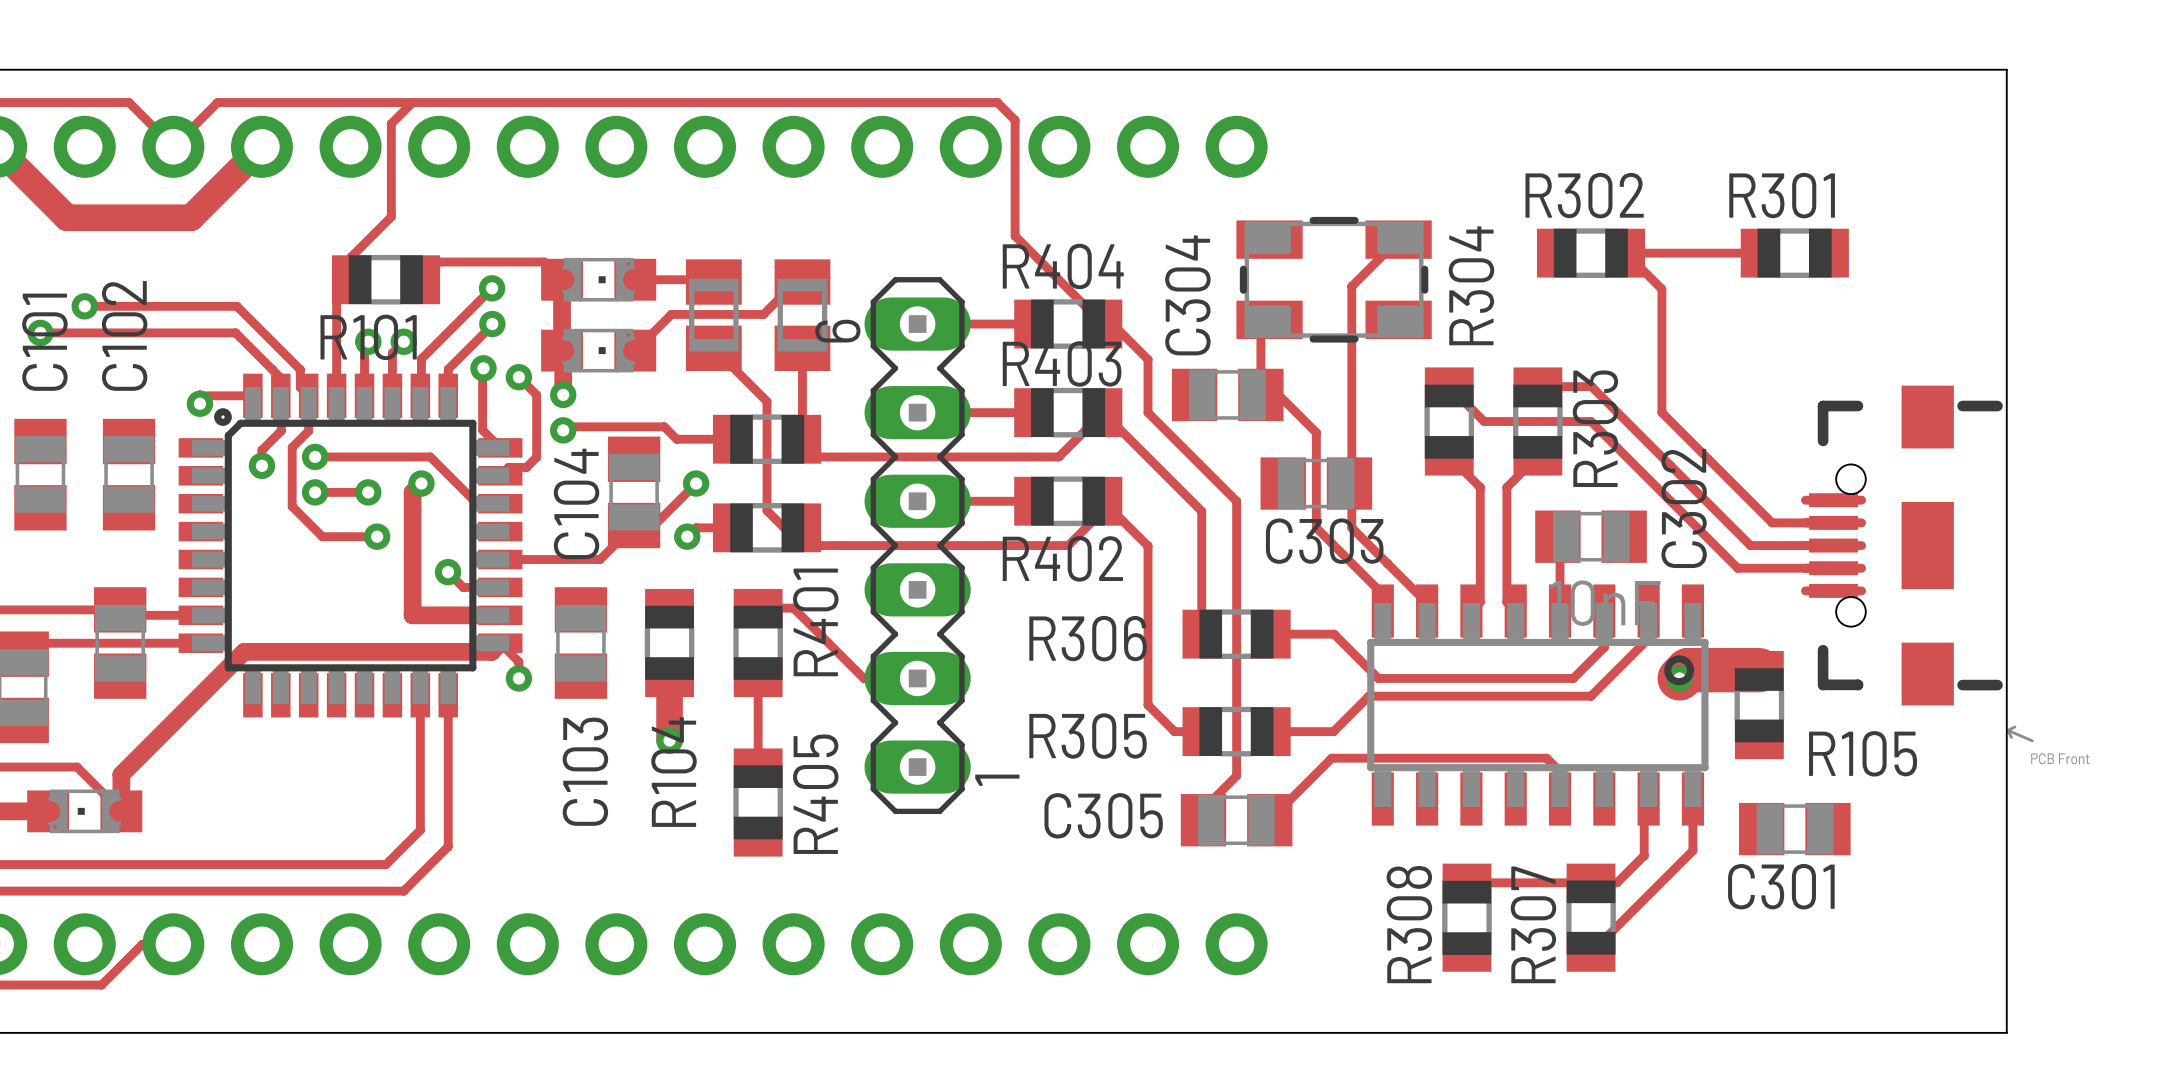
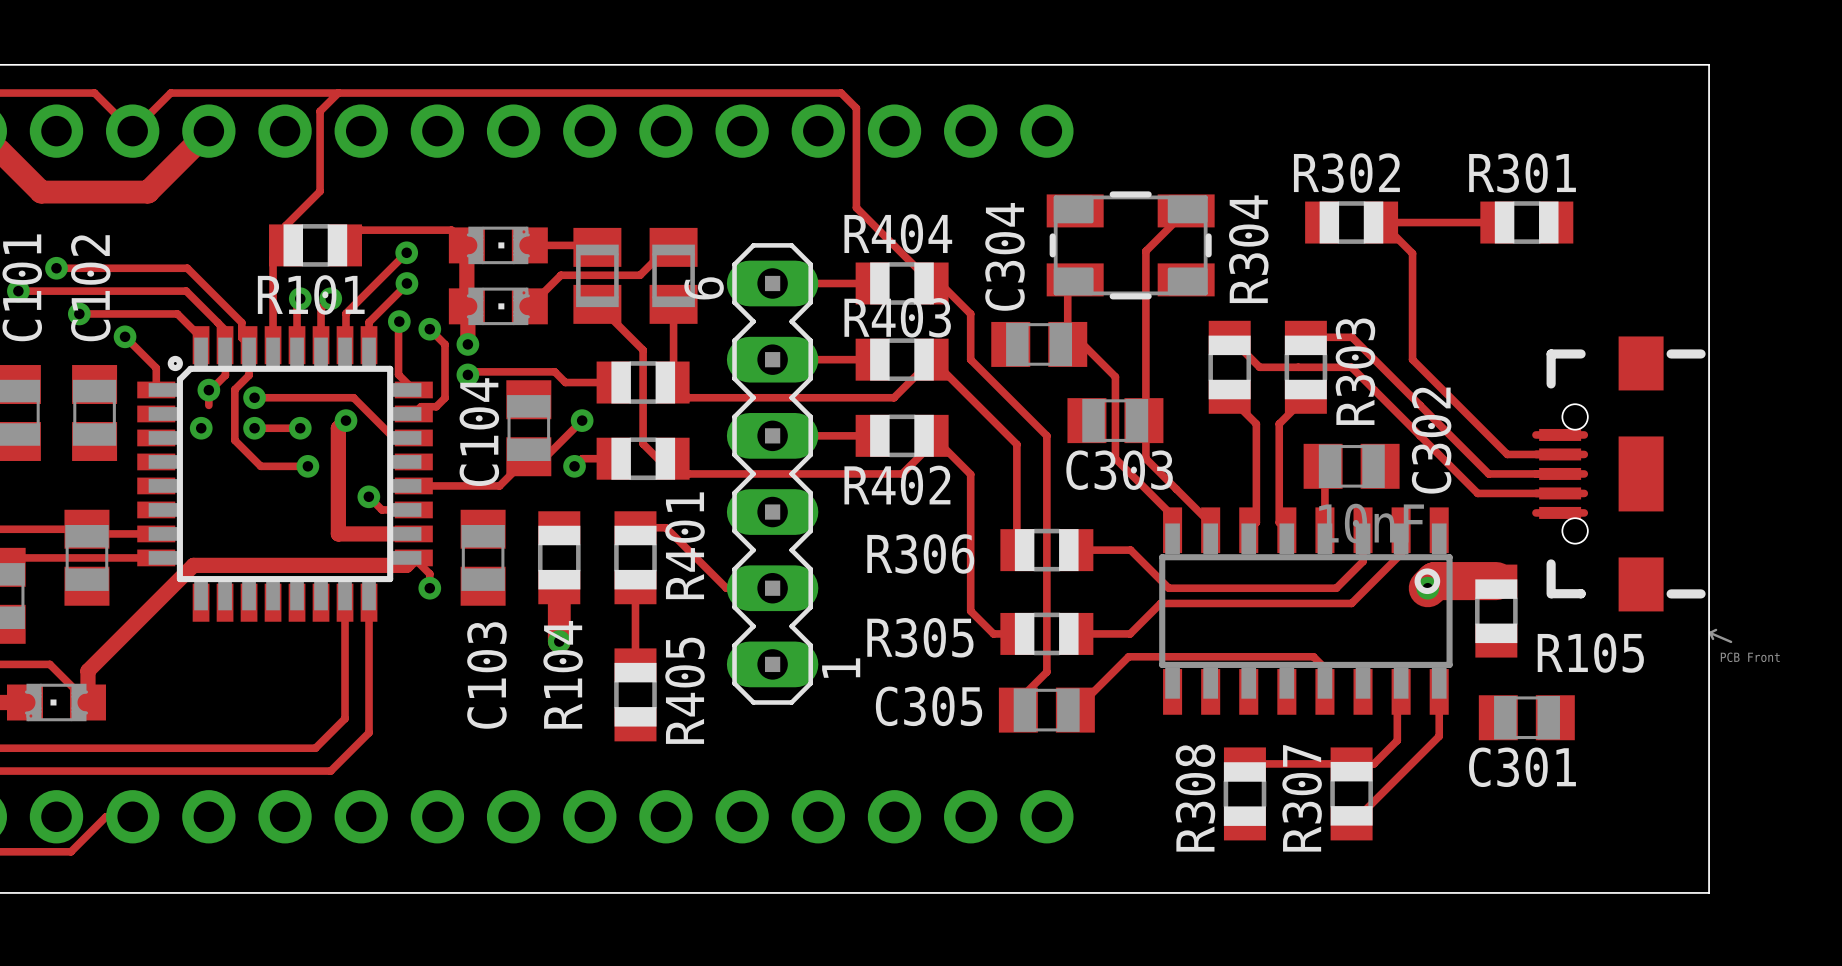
via: none -> (79, 313)
track: none -> (125, 336) (156, 368) (156, 389)
via: none -> (125, 336)
track: (252, 395) (199, 394) (199, 403) -> (201, 345) (201, 337) (177, 313) (79, 313)
via: (199, 403) -> none
via position: (261, 465) -> (208, 390)
via: none -> (201, 428)

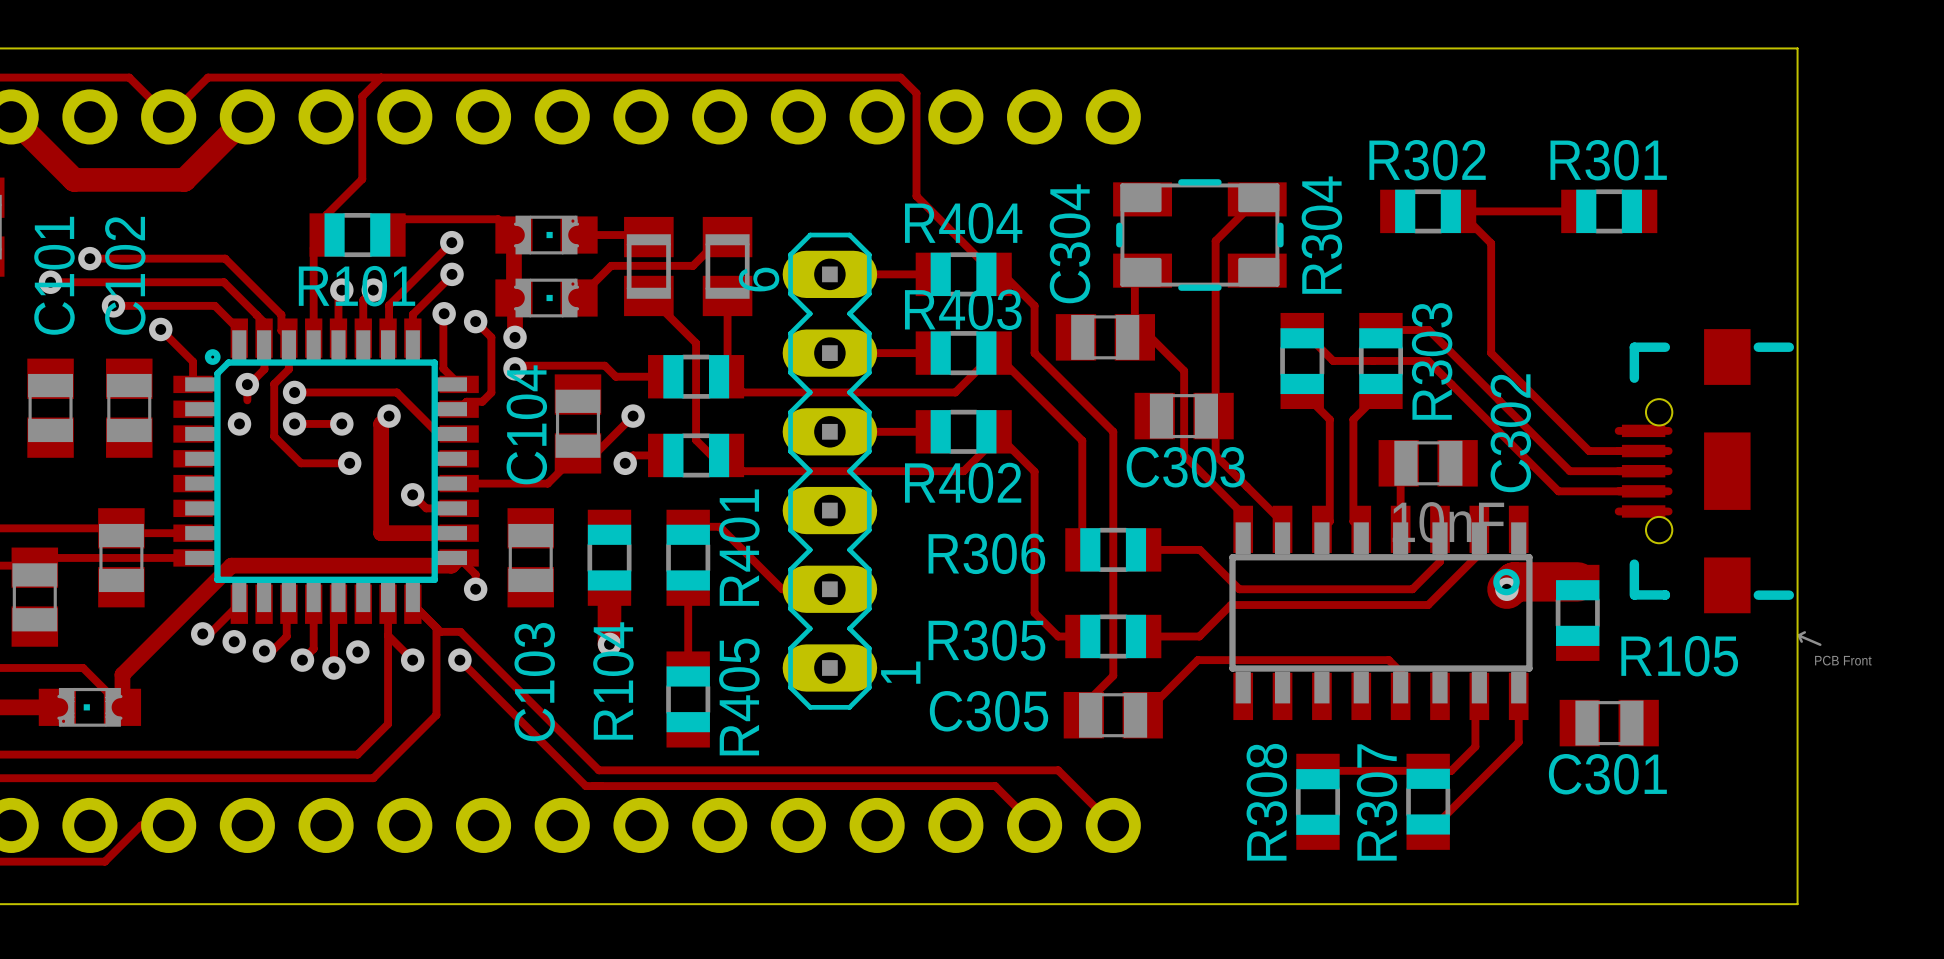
track: none -> (239, 604) (209, 633) (202, 633)
track: none -> (288, 604) (286, 606) (286, 636) (272, 650) (264, 650)
track: none -> (313, 604) (313, 648) (302, 660)
track: none -> (338, 604) (333, 608) (333, 667)
track: (369, 602) (369, 732) -> (436, 627) (436, 715) (412, 738)
track: none -> (412, 604) (440, 631) (460, 631) (598, 770) (1058, 770) (1113, 825)
via: none -> (202, 633)
track: none -> (388, 635) (412, 660)
via: none -> (234, 641)
via: none -> (264, 650)
via: none -> (357, 652)
via: none -> (302, 660)
via: none -> (412, 660)
track: none -> (459, 660) (585, 786) (995, 786) (1034, 825)
via: none -> (459, 660)
via: none -> (333, 667)

